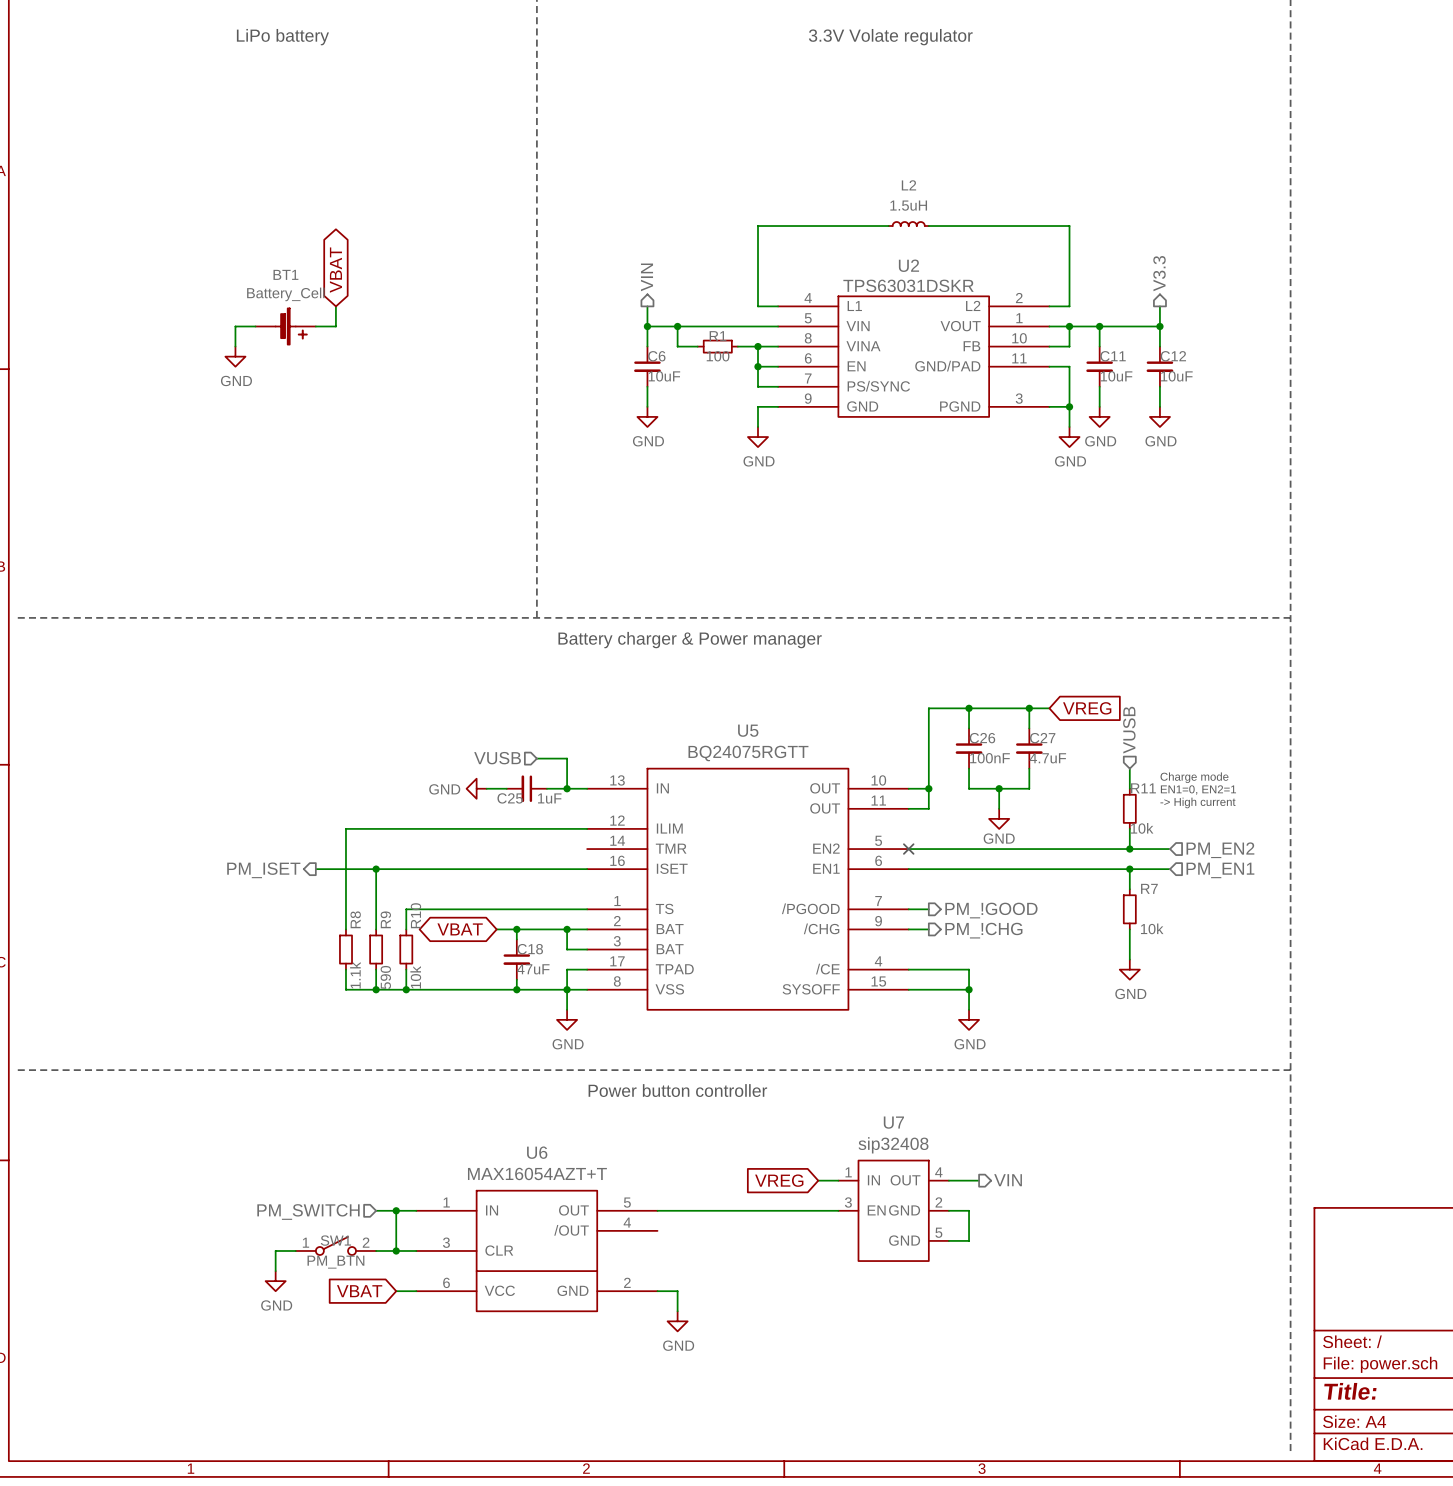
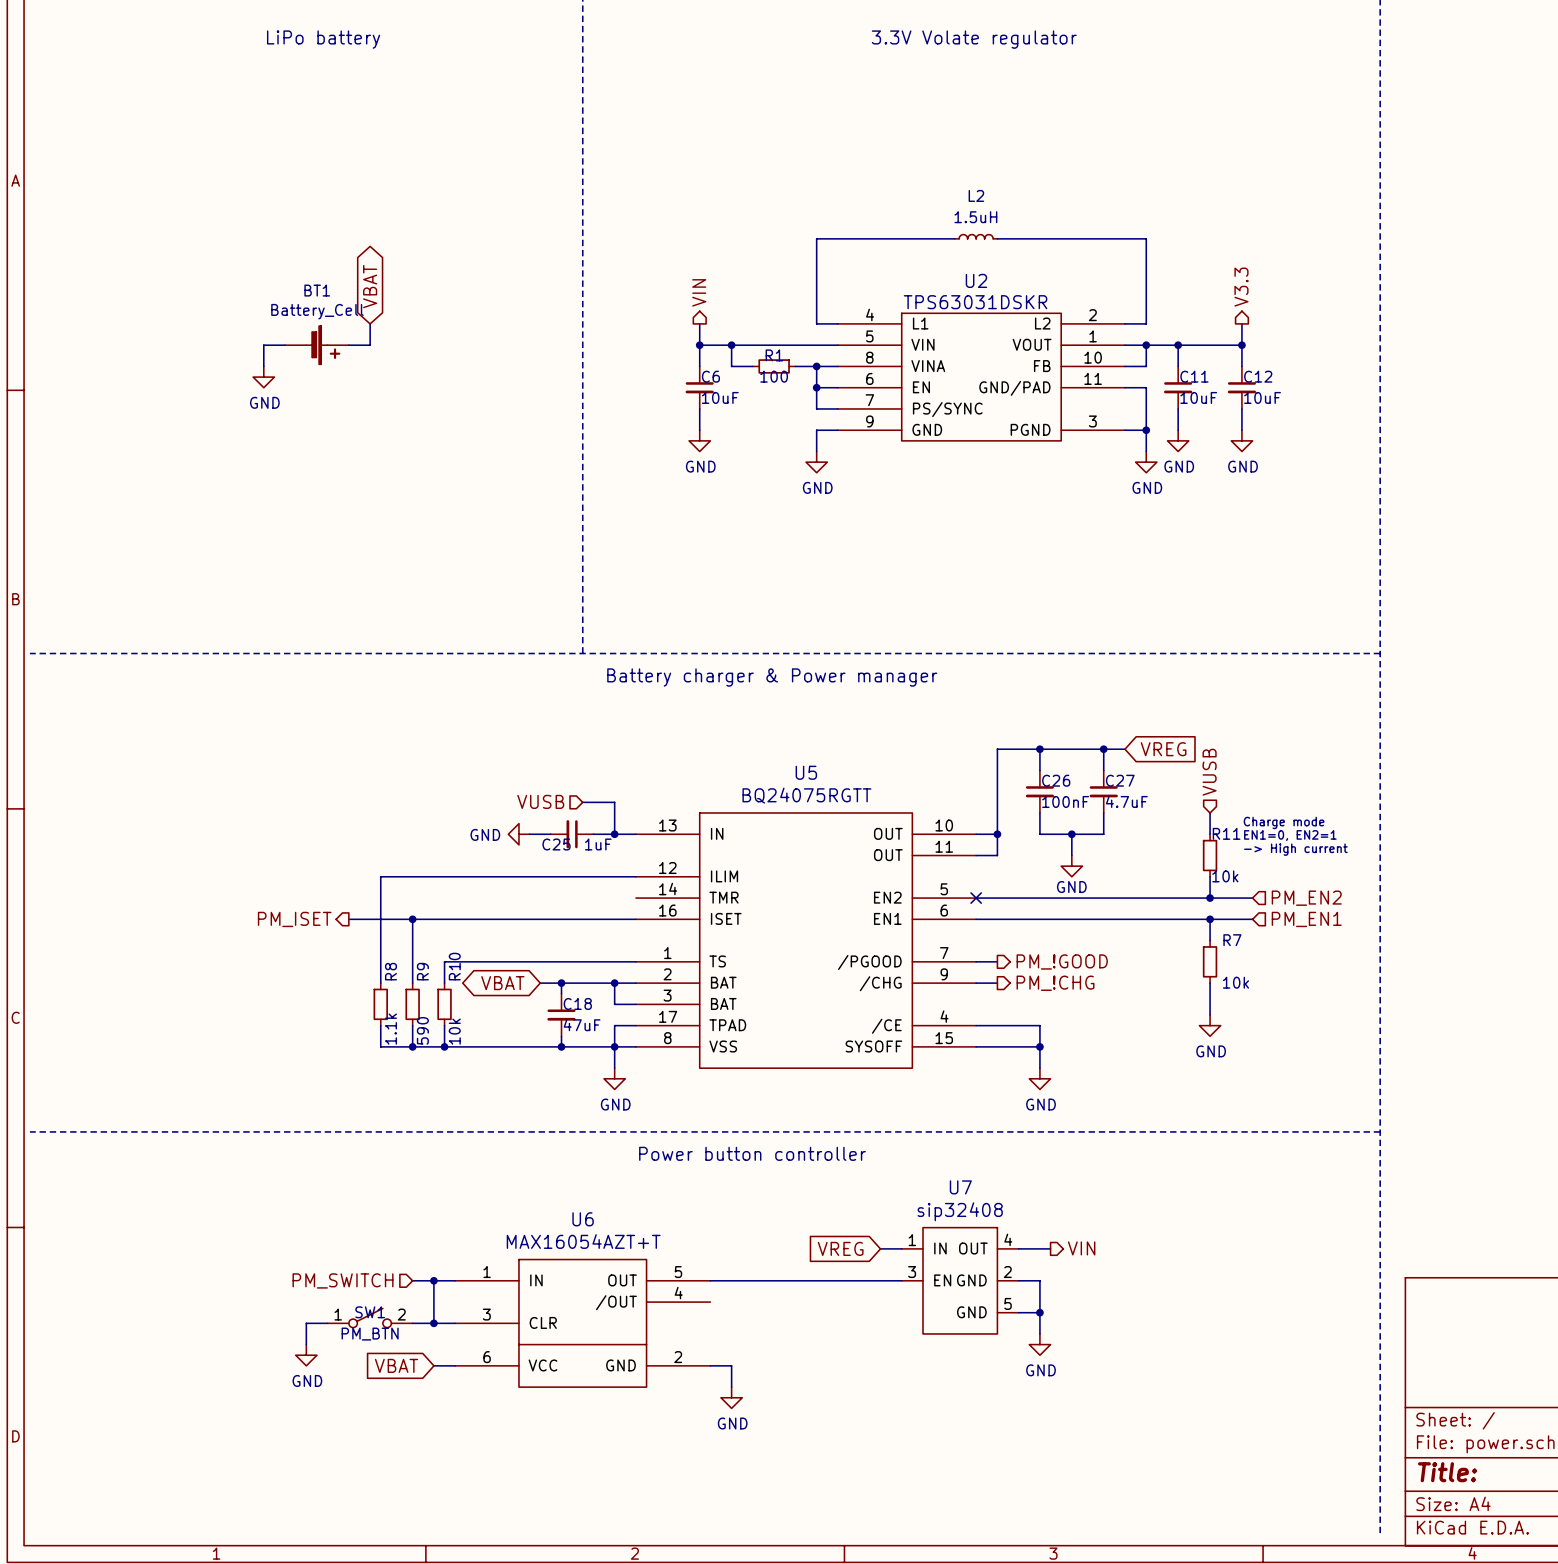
wire: none -> (1039, 1312) (1039, 1333)
junction: none -> (1039, 1312)
power symbol: none -> GND (1039, 1344)

